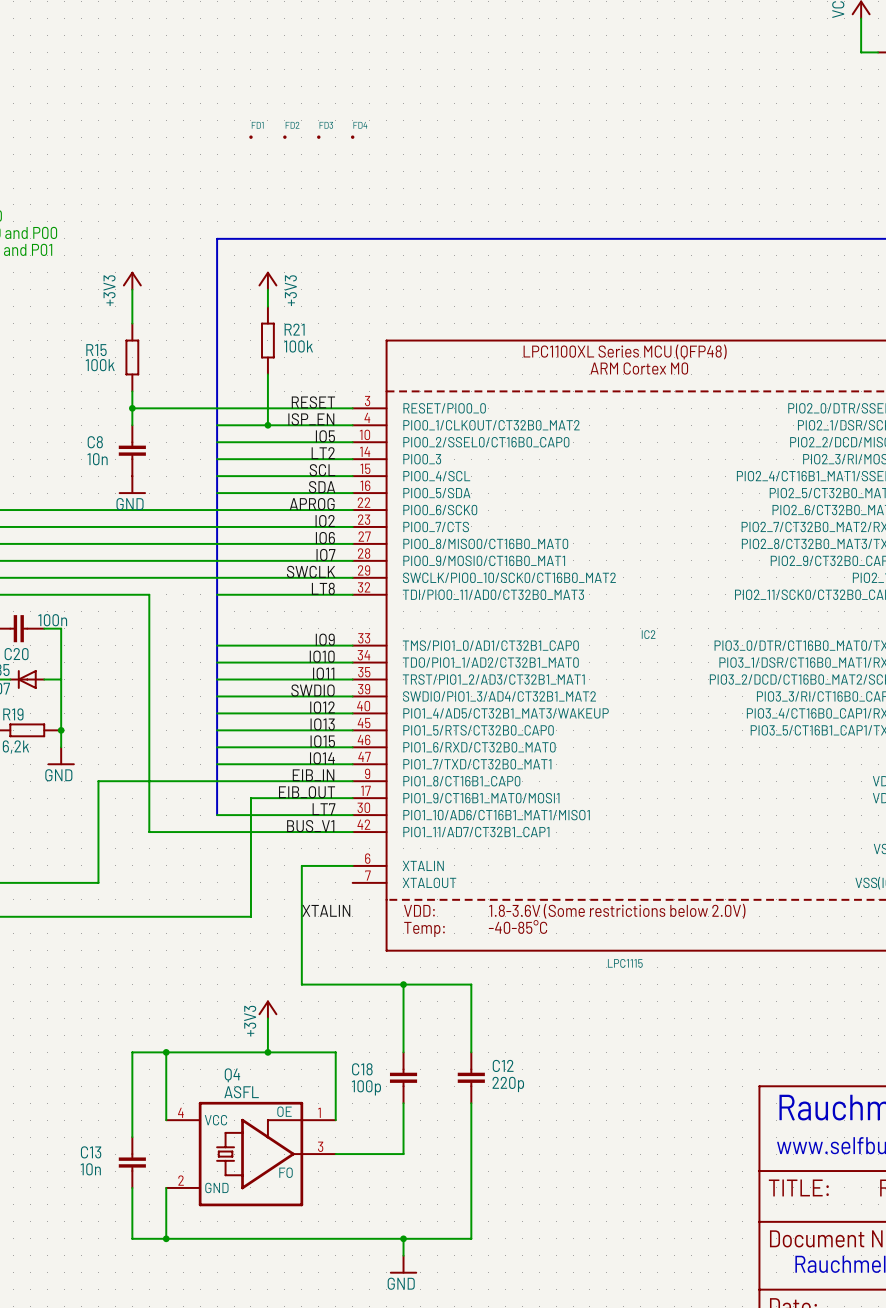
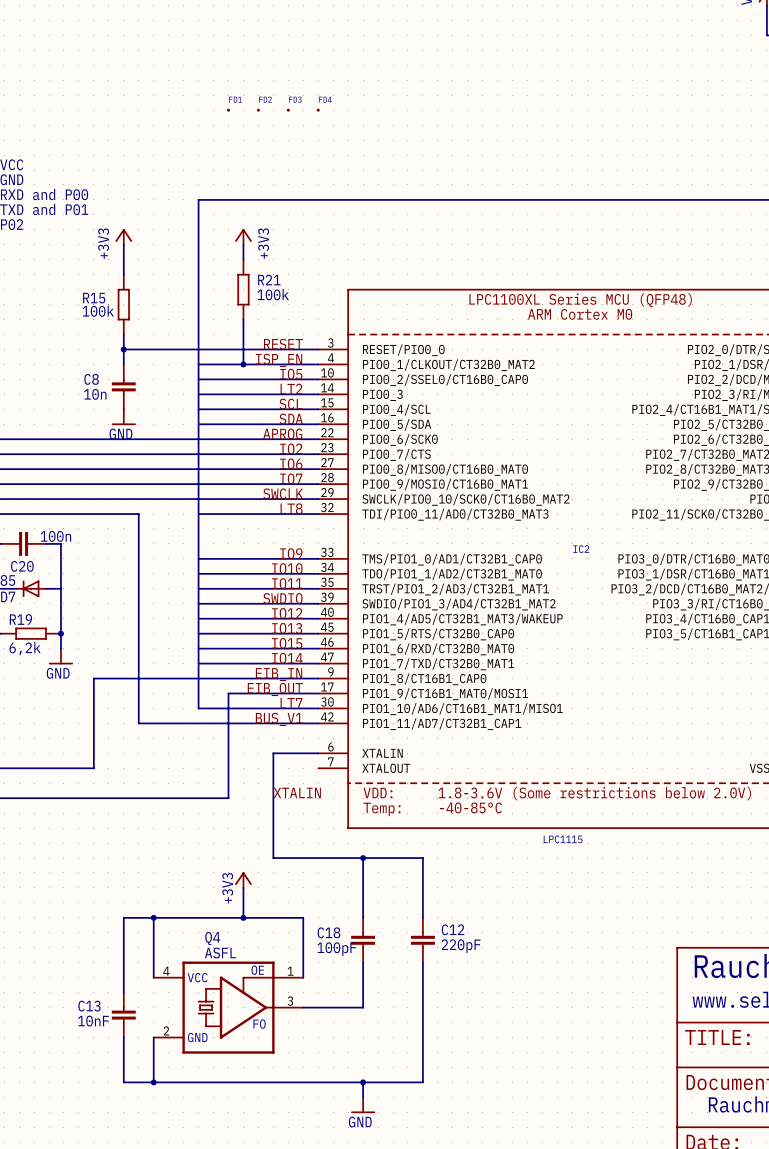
C12 value: 220p (508, 1084) -> 220pF (461, 946)
C18 value: 100p (366, 1087) -> 100pF (336, 949)
C13 value: 10n (90, 1169) -> 10nF (93, 1021)

